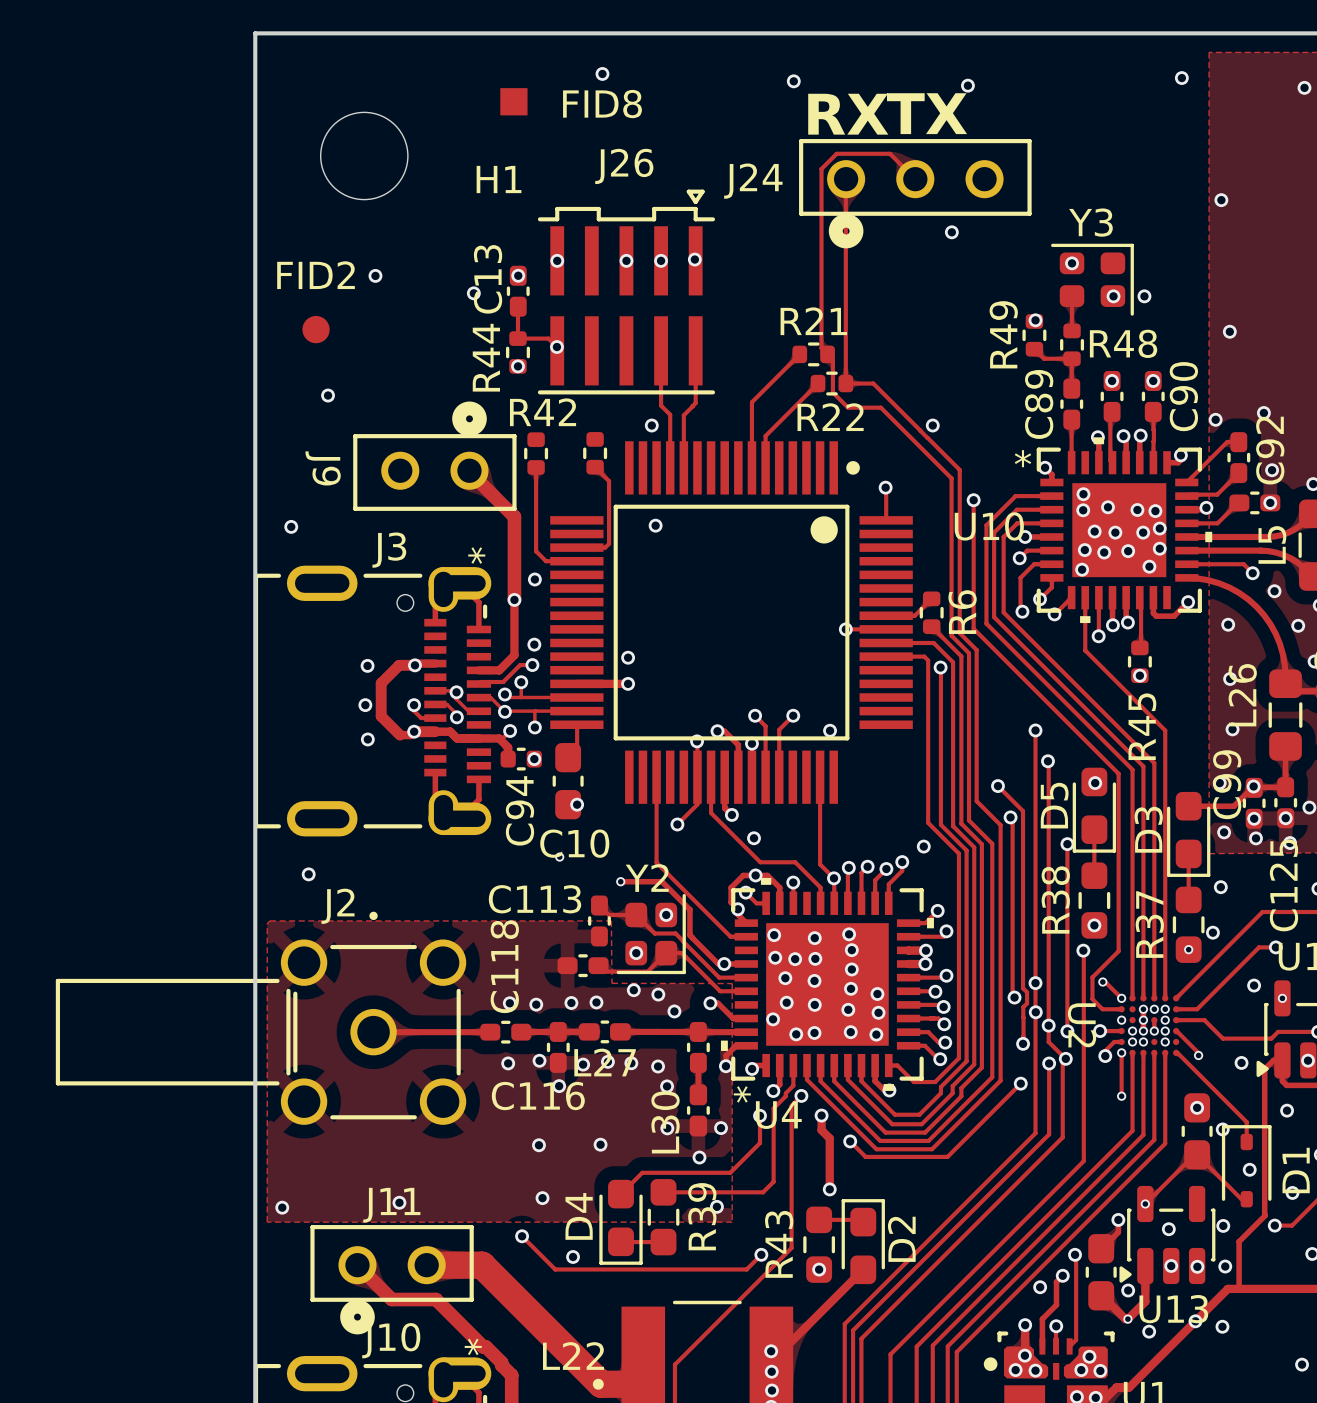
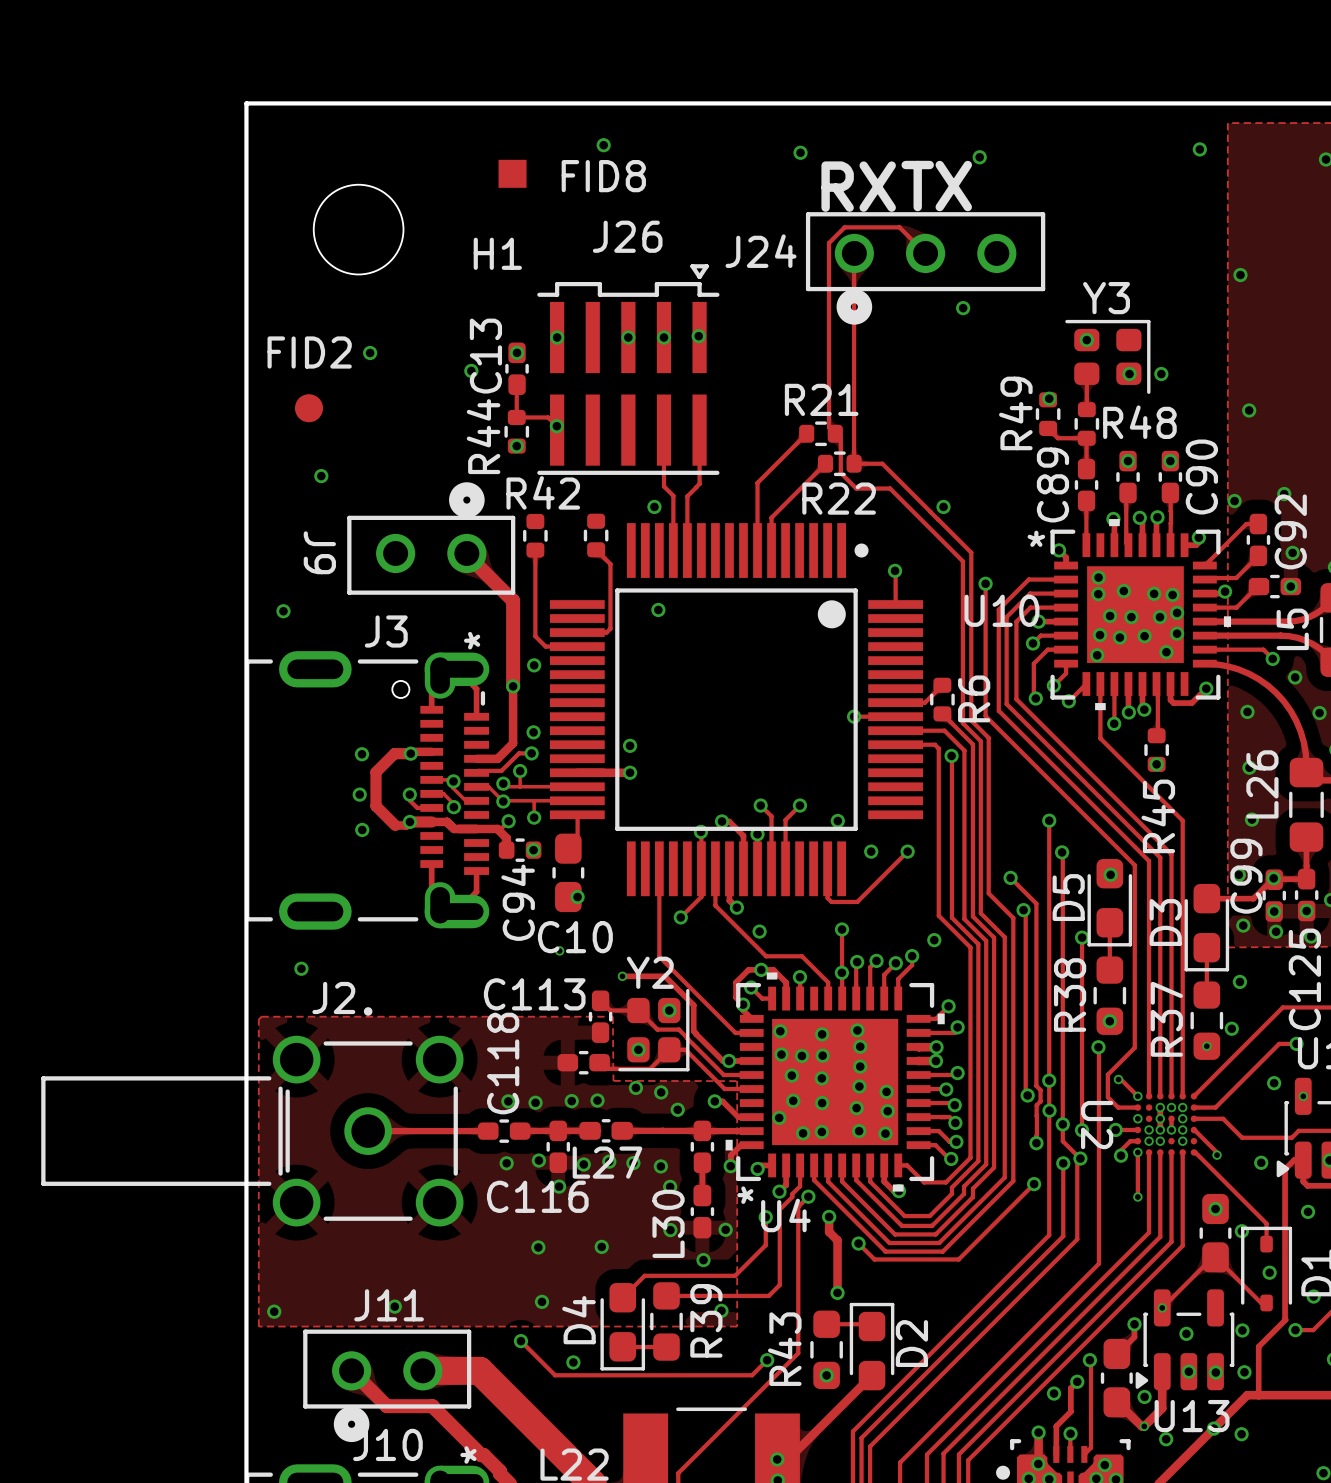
via: none -> (871, 851)
track: none -> (907, 851) (857, 901) (831, 901) (827, 898)
via: none -> (907, 851)
track: (820, 805) (820, 864) (834, 878) -> (842, 929) (842, 972)
via: none -> (842, 929)

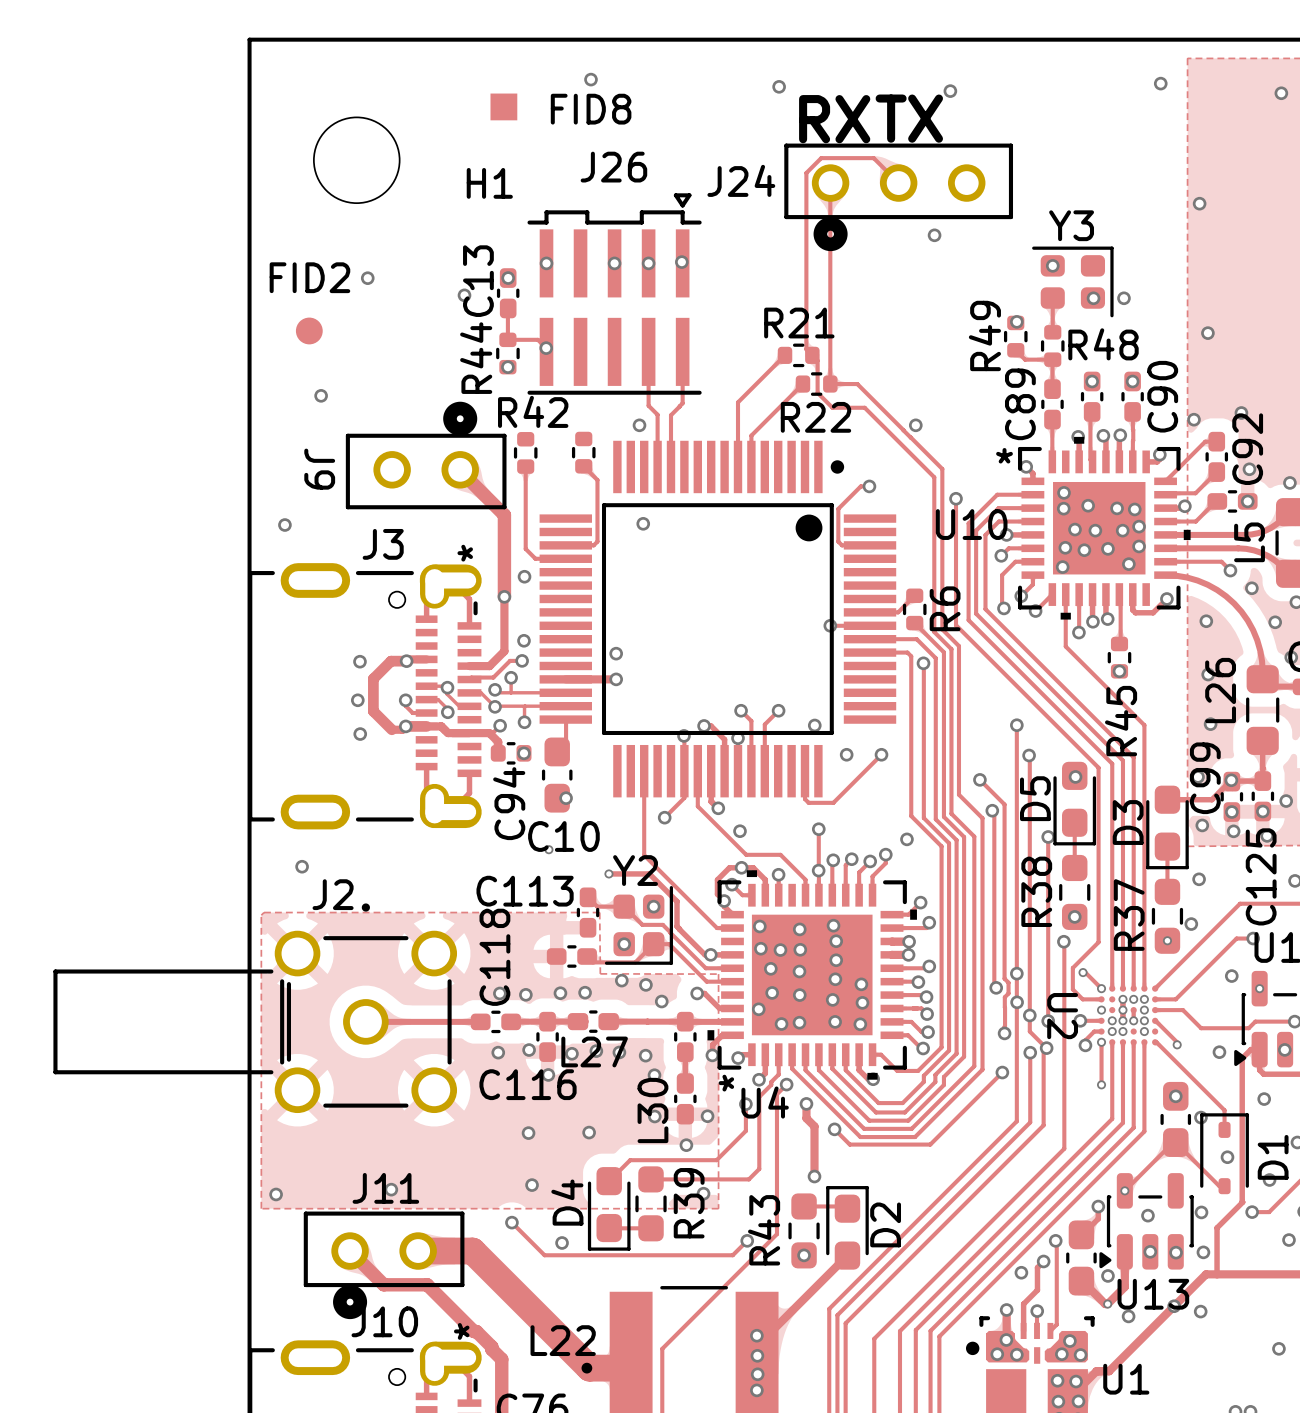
track: (895, 571) (895, 604) -> (869, 486) (860, 486) (838, 508) (838, 541) (842, 545) (870, 545)

